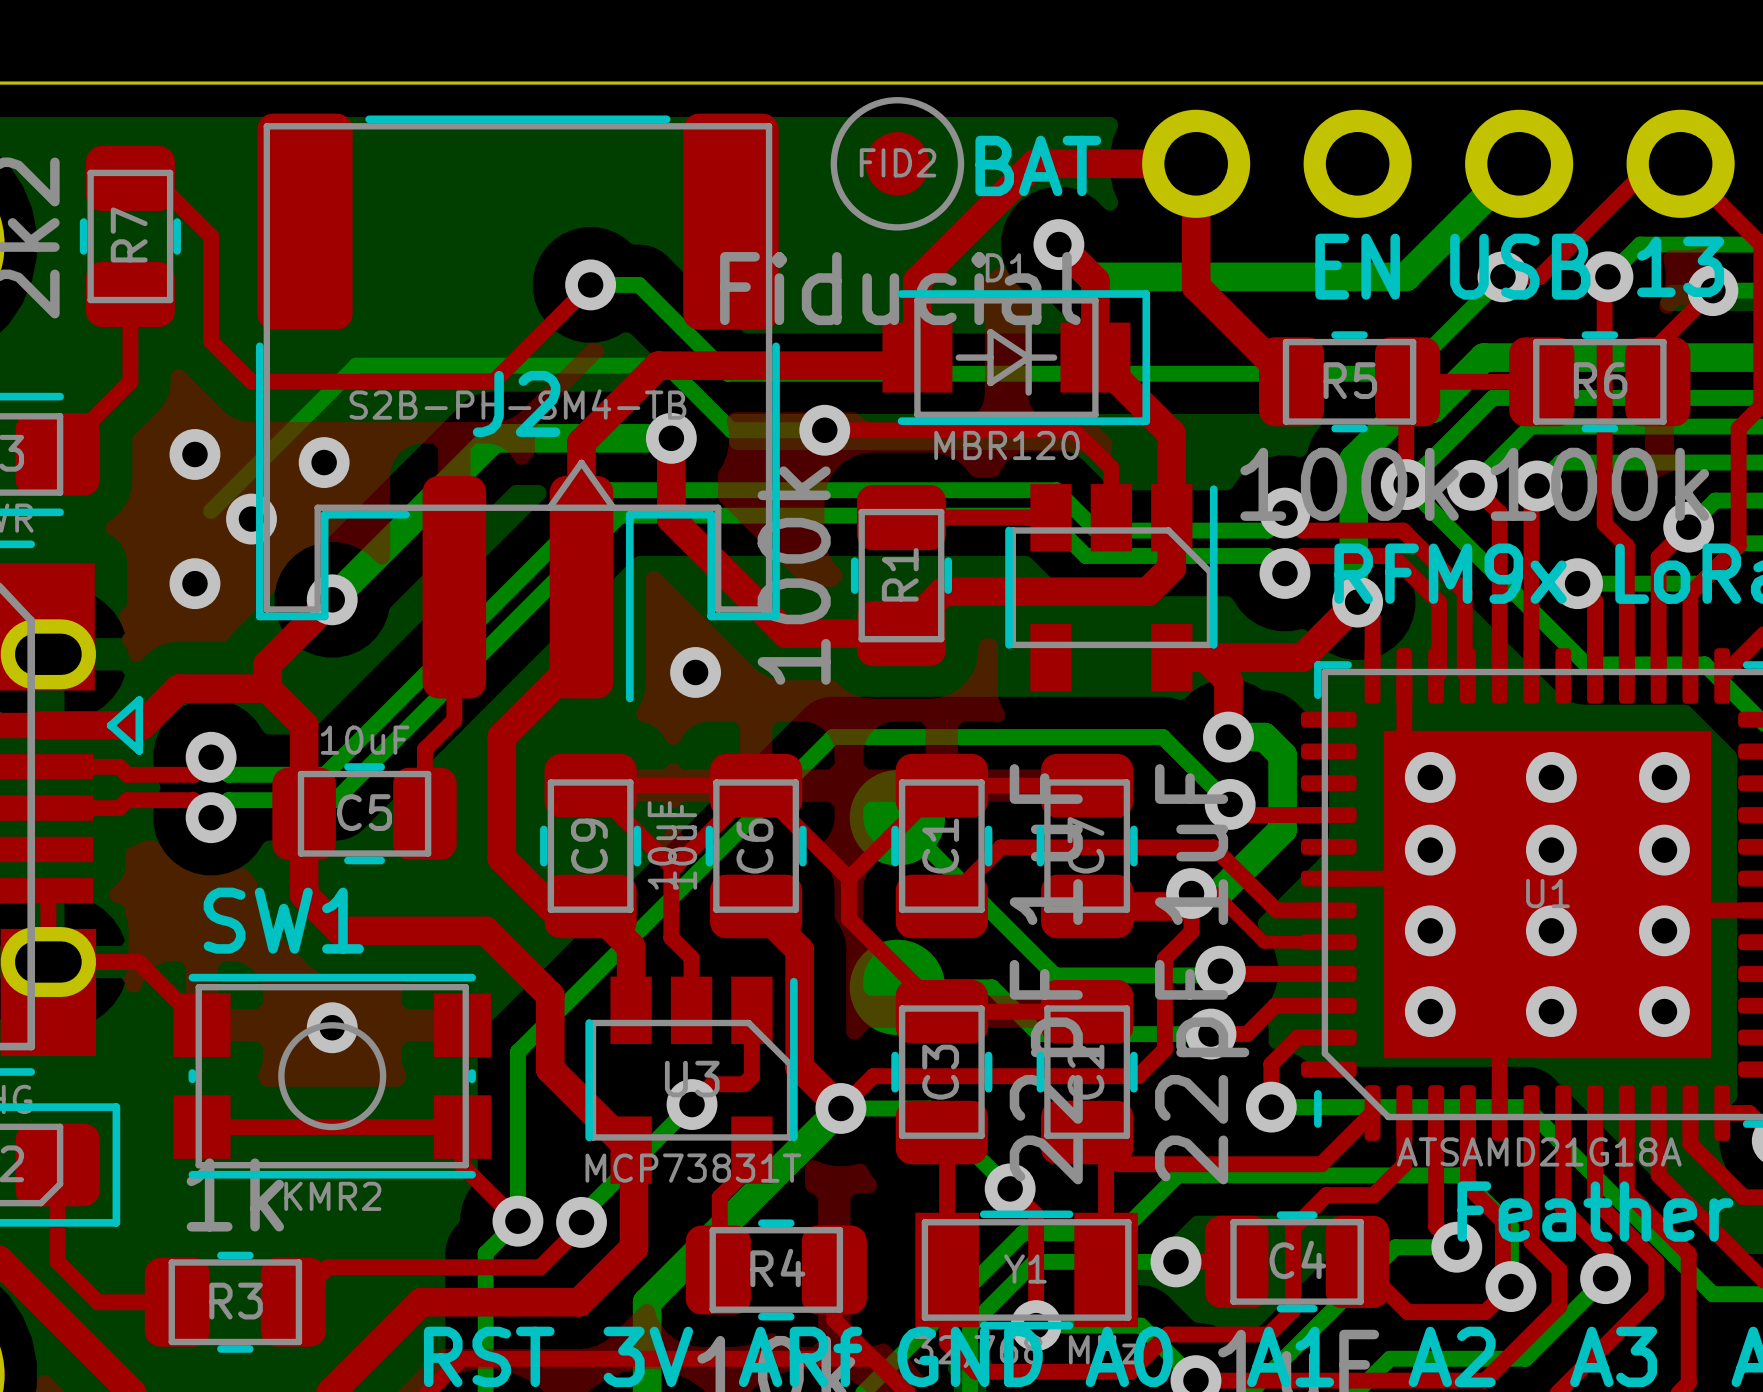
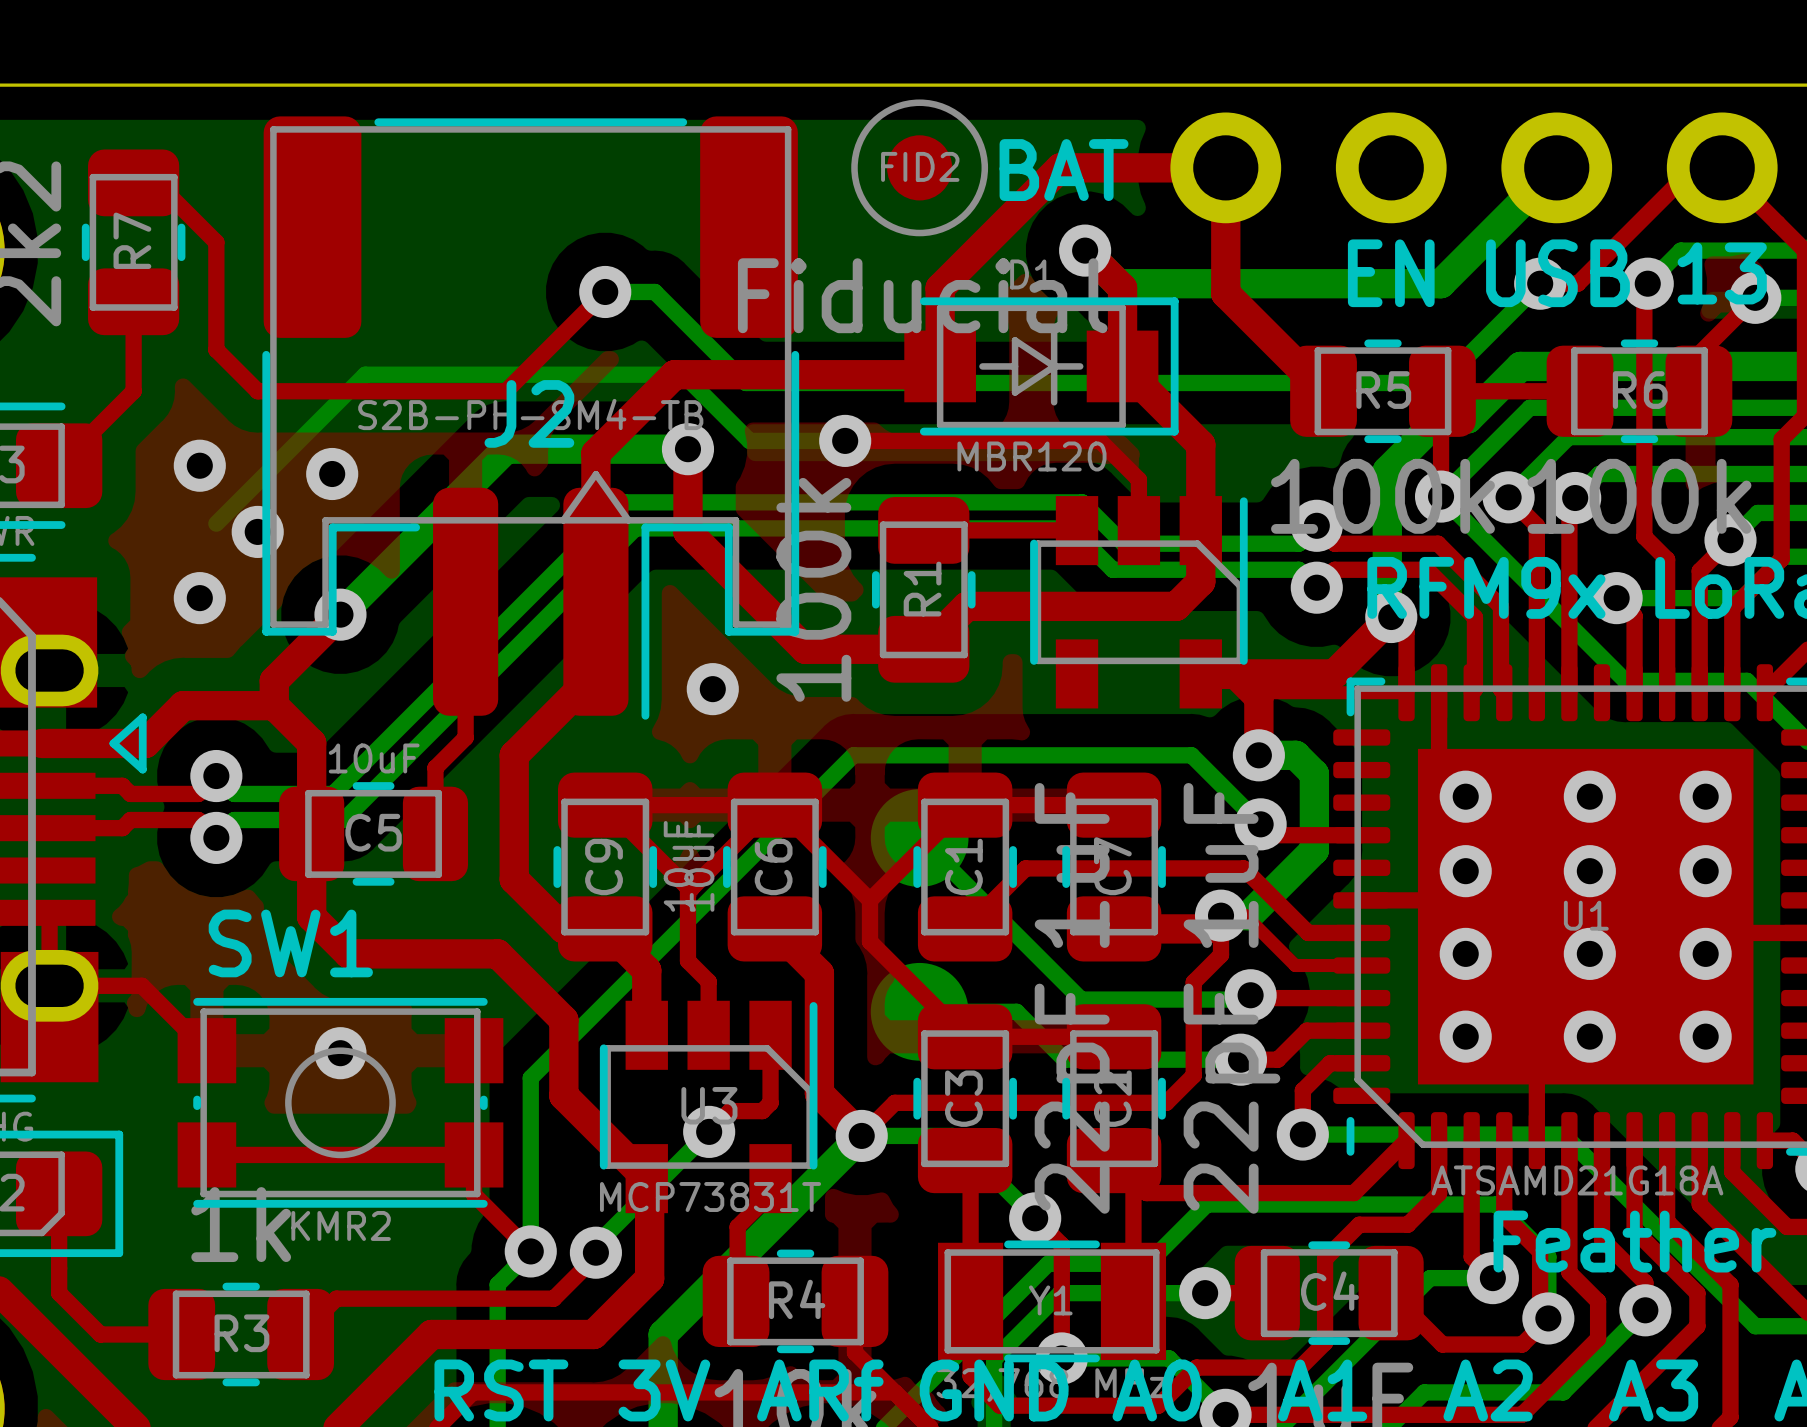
top track: none -> (1263, 692) (1406, 692)

